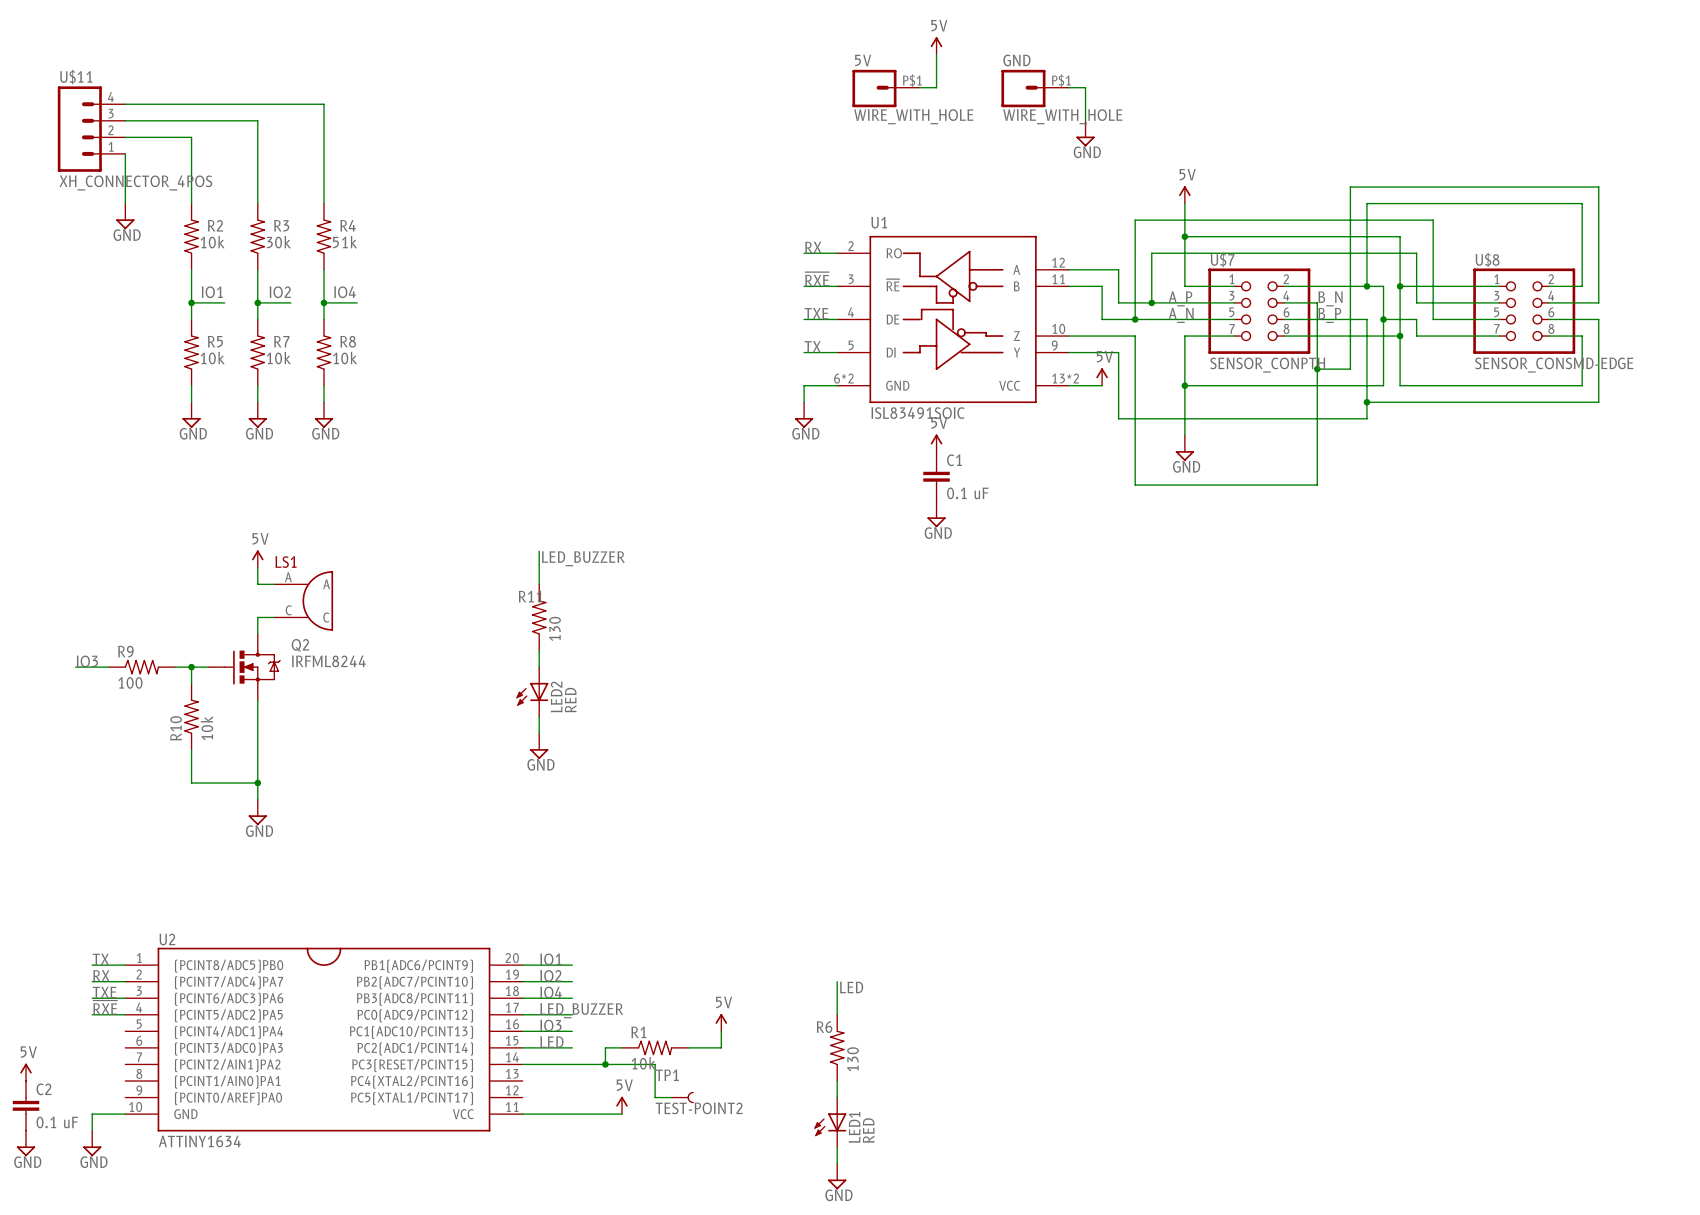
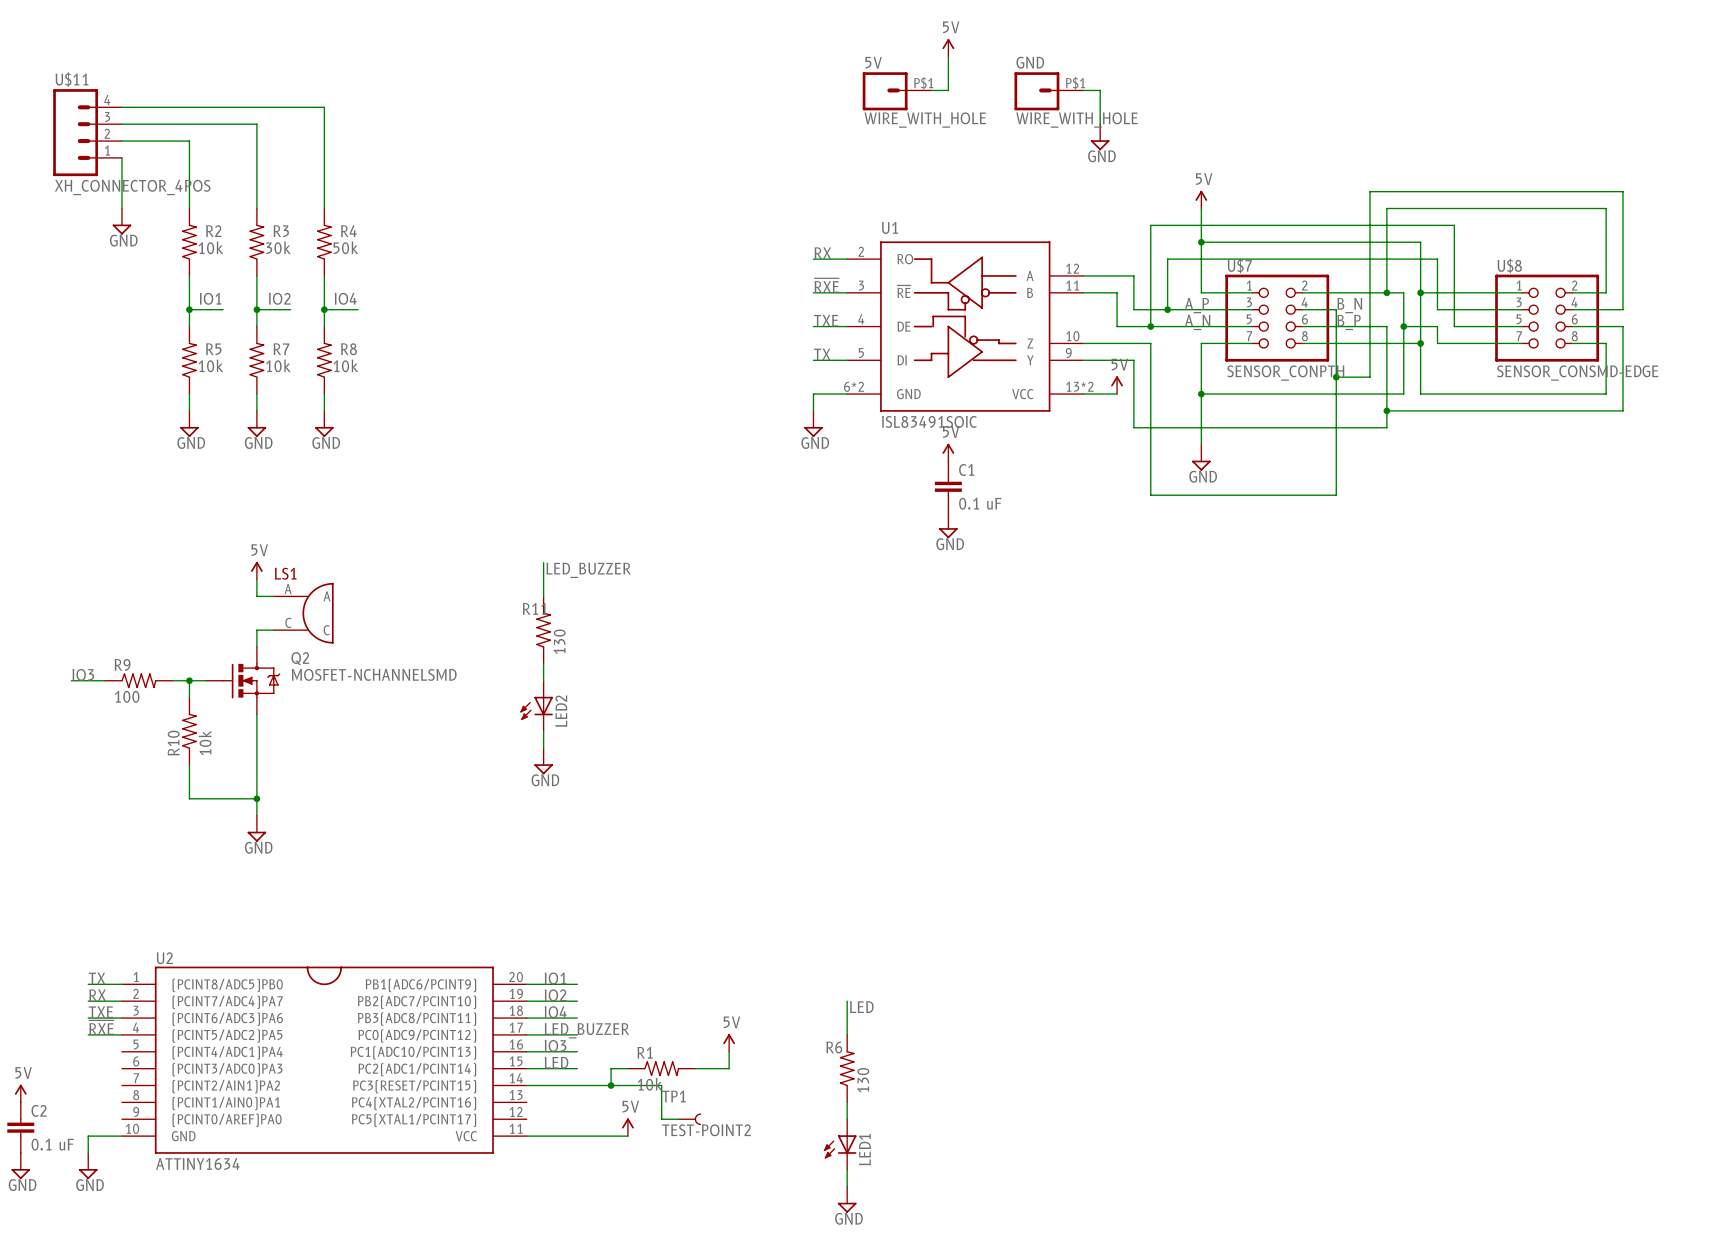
R4 value: 51k (345, 242) -> 50k (345, 247)
Q2 value: IRFML8244 (328, 661) -> MOSFET-NCHANNELSMD (374, 674)
LED2 value: RED (570, 700) -> none
LED1 value: RED (868, 1130) -> none

